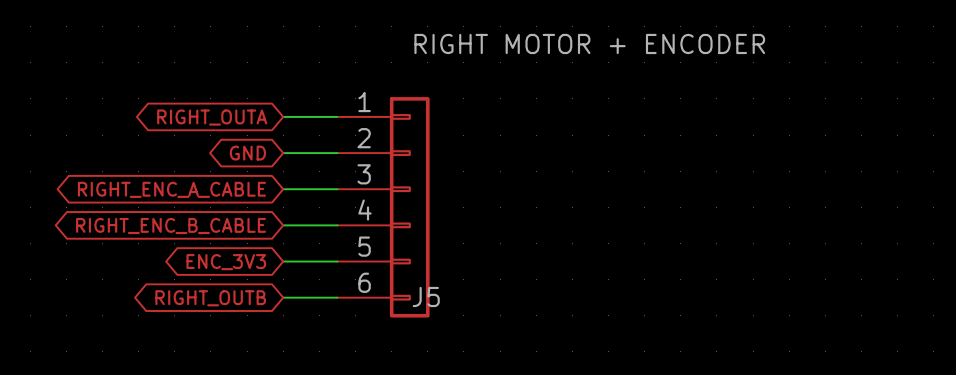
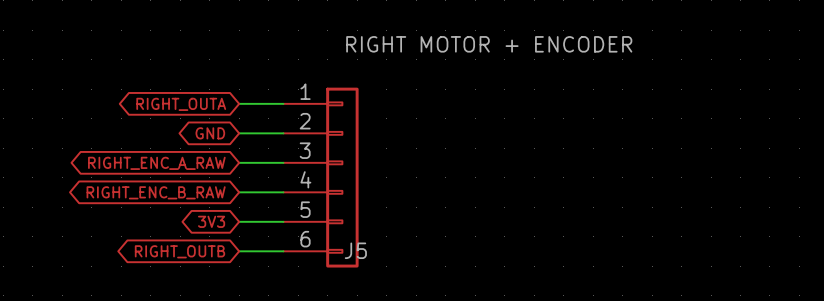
global label: RIGHT_ENC_A_CABLE (171, 189) -> RIGHT_ENC_A_RAW (156, 163)
global label: RIGHT_ENC_B_CABLE (171, 225) -> RIGHT_ENC_B_RAW (156, 192)
global label: ENC_3V3 (226, 262) -> 3V3 (211, 221)

